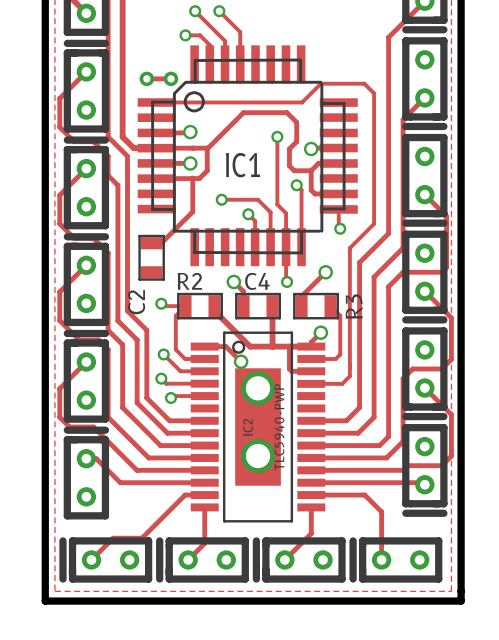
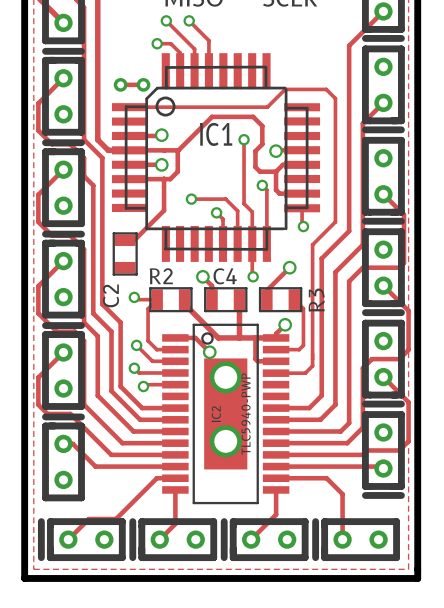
IC1 name position: IC1 (242, 165) -> IC1 (216, 134)

